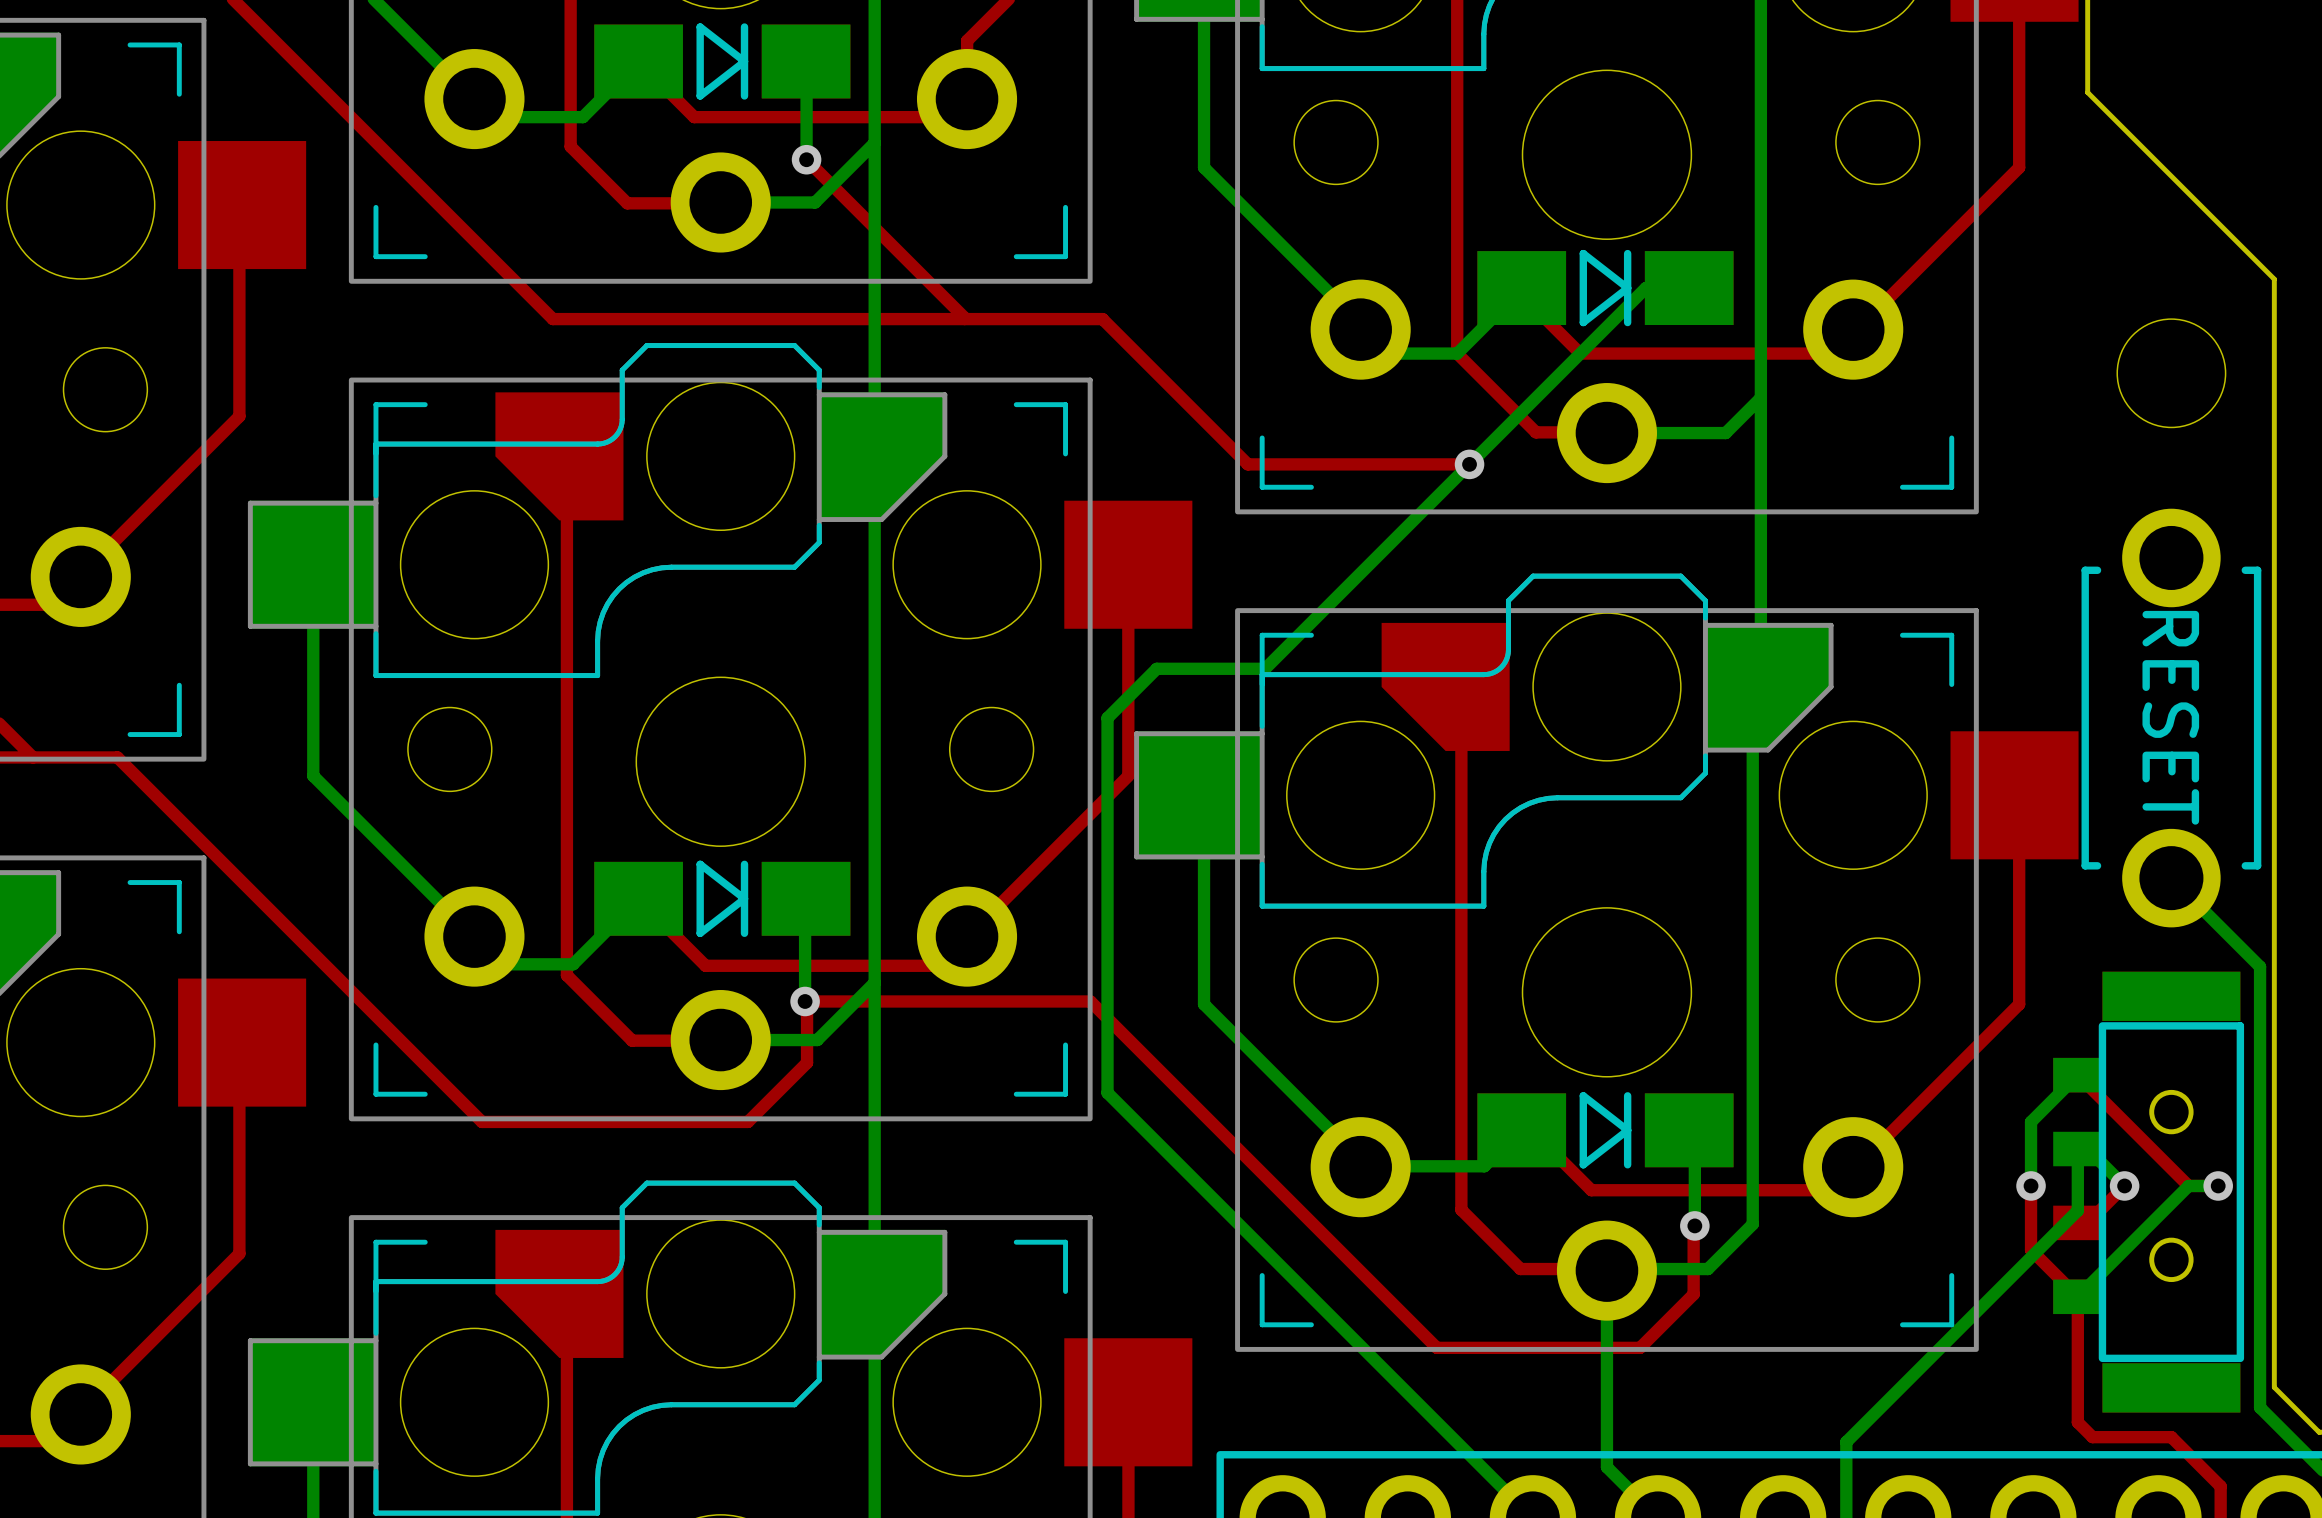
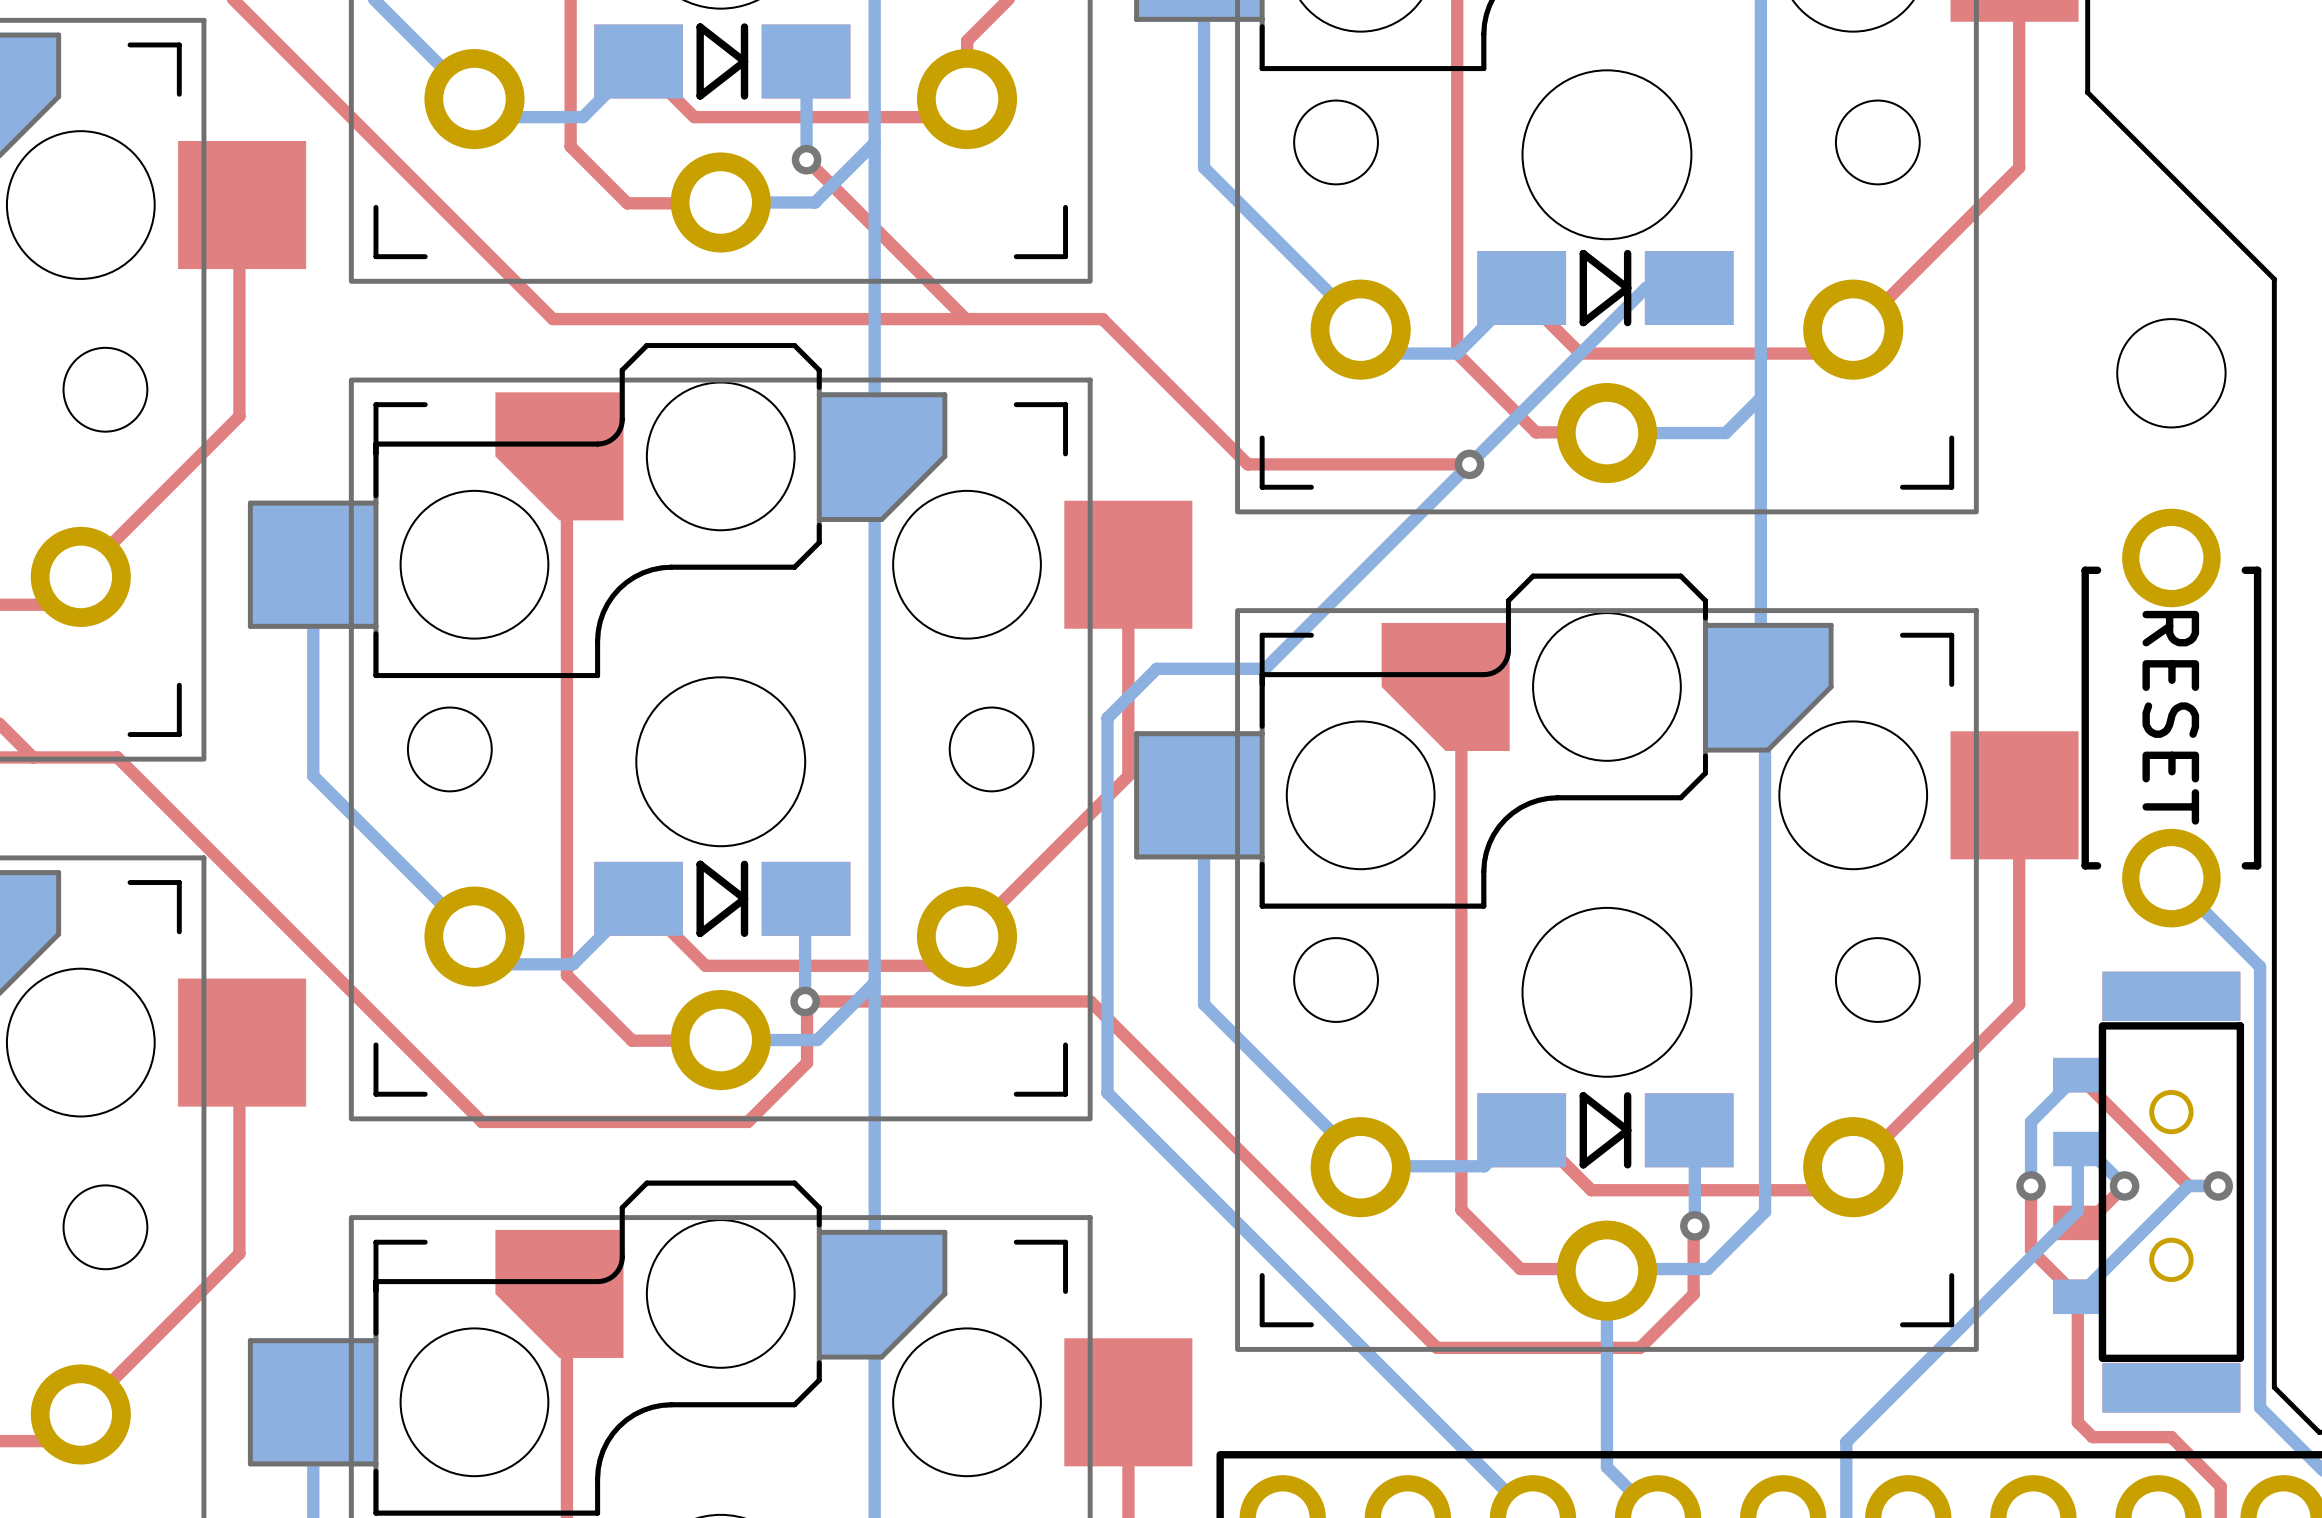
bottom track: (1765, 693) (1752, 705) (1752, 1224) -> (1765, 693) (1765, 1211) (1752, 1224)

